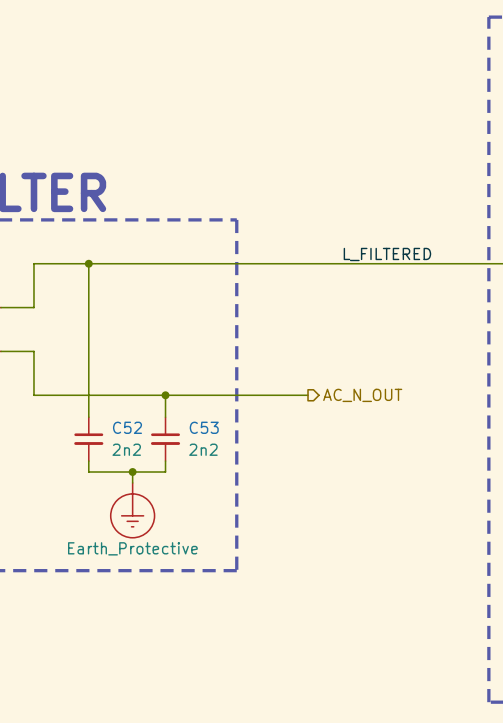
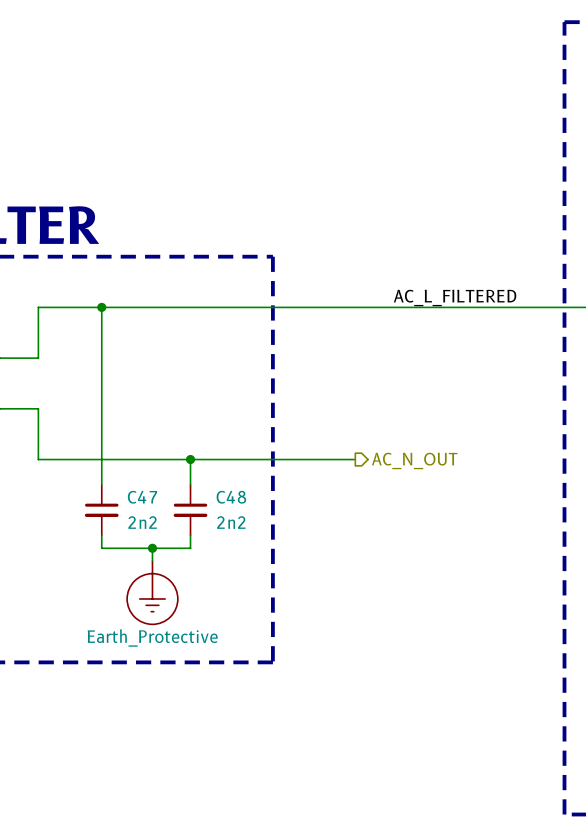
label: L_FILTERED (387, 254) -> AC_L_FILTERED (455, 297)
C52 name: C52 (127, 427) -> C47 (142, 497)
C53 name: C53 (204, 427) -> C48 (231, 497)

